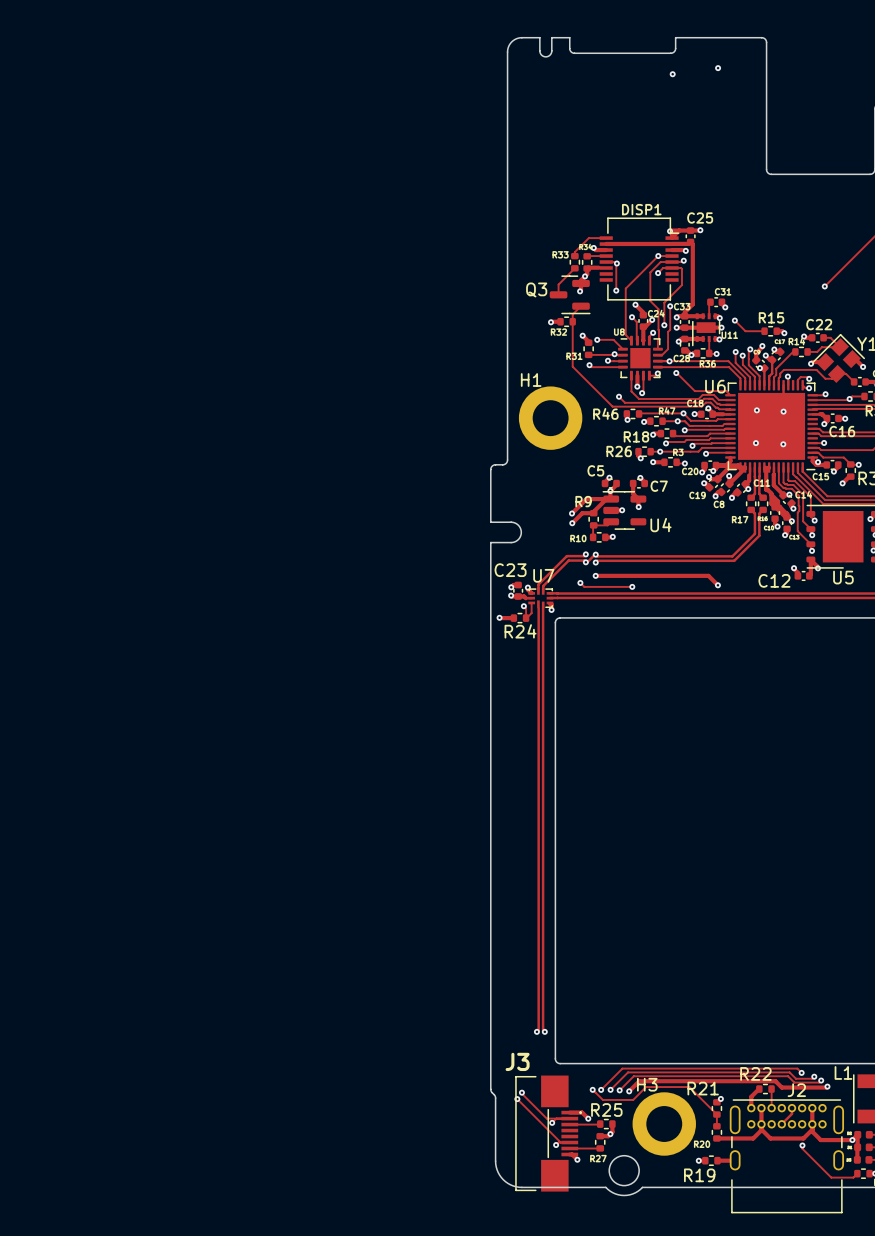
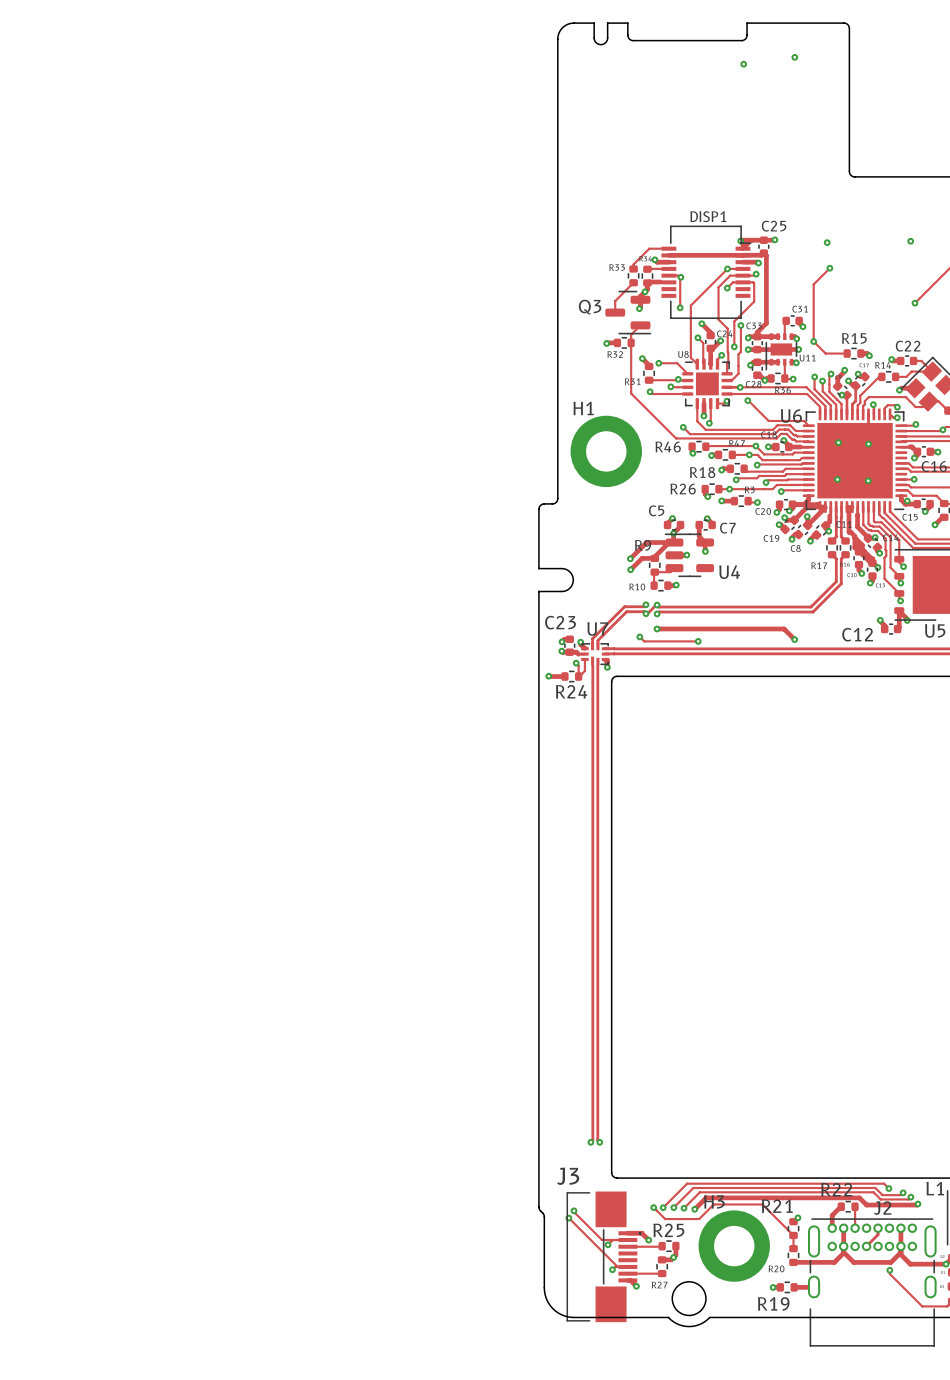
via: none -> (910, 241)
via: none -> (827, 242)
track: none -> (829, 268) (813, 284) (813, 341)
via: none -> (829, 268)

